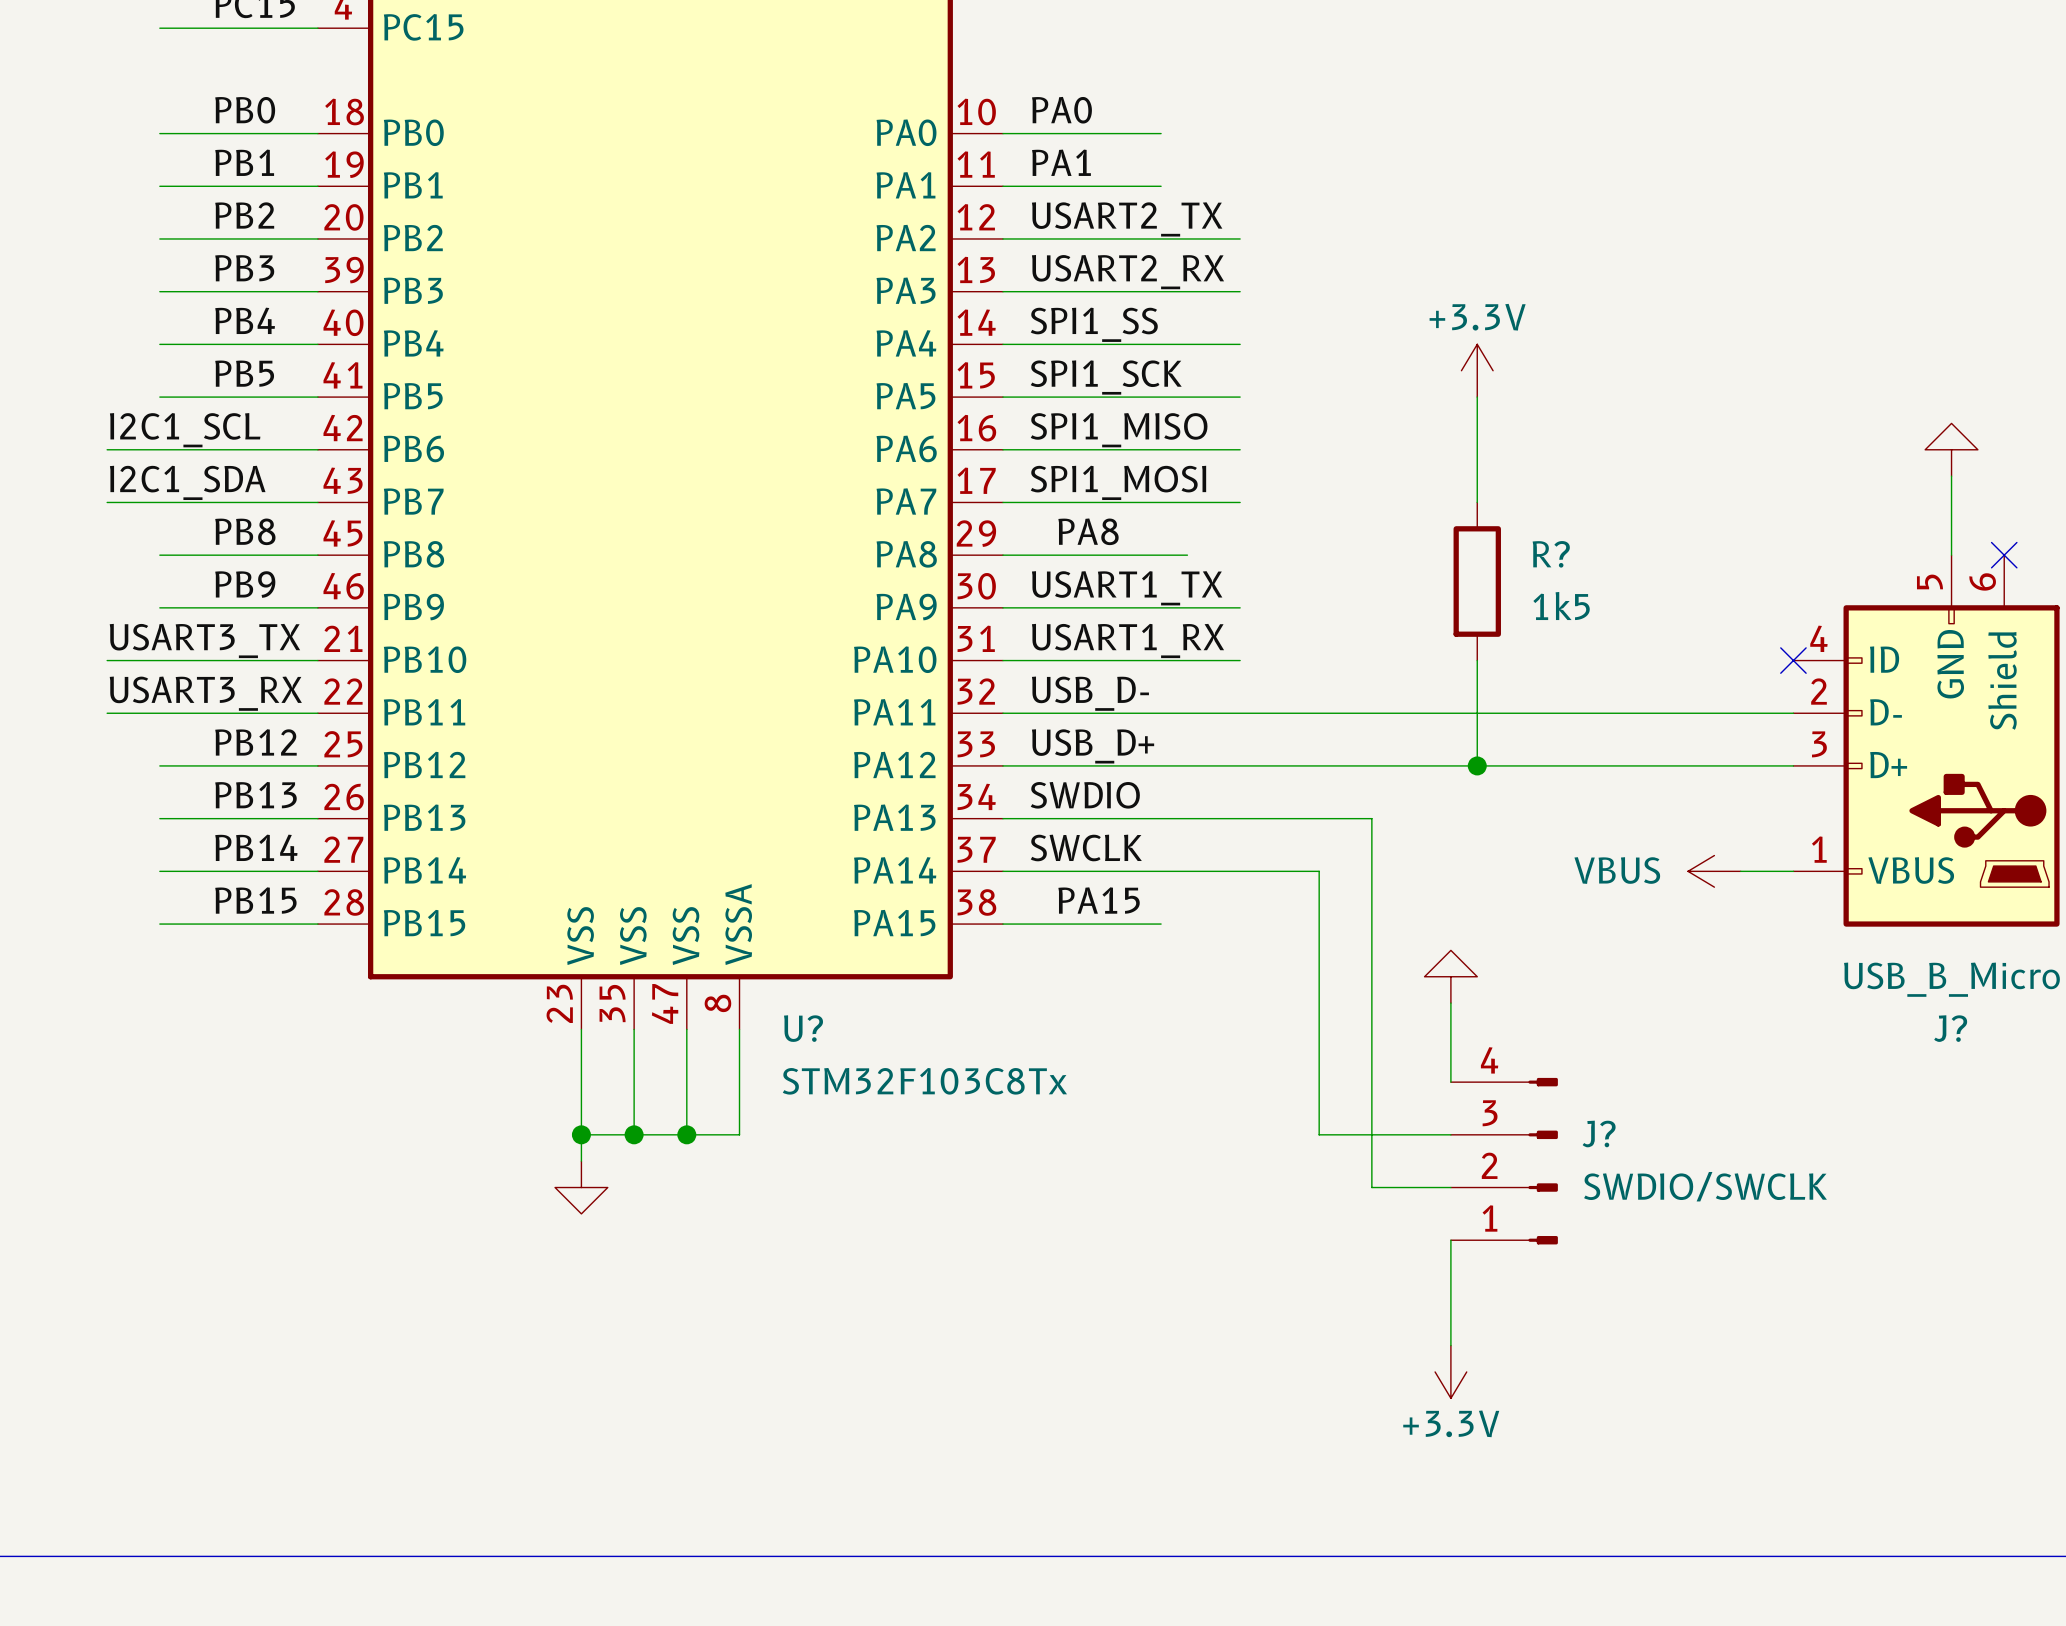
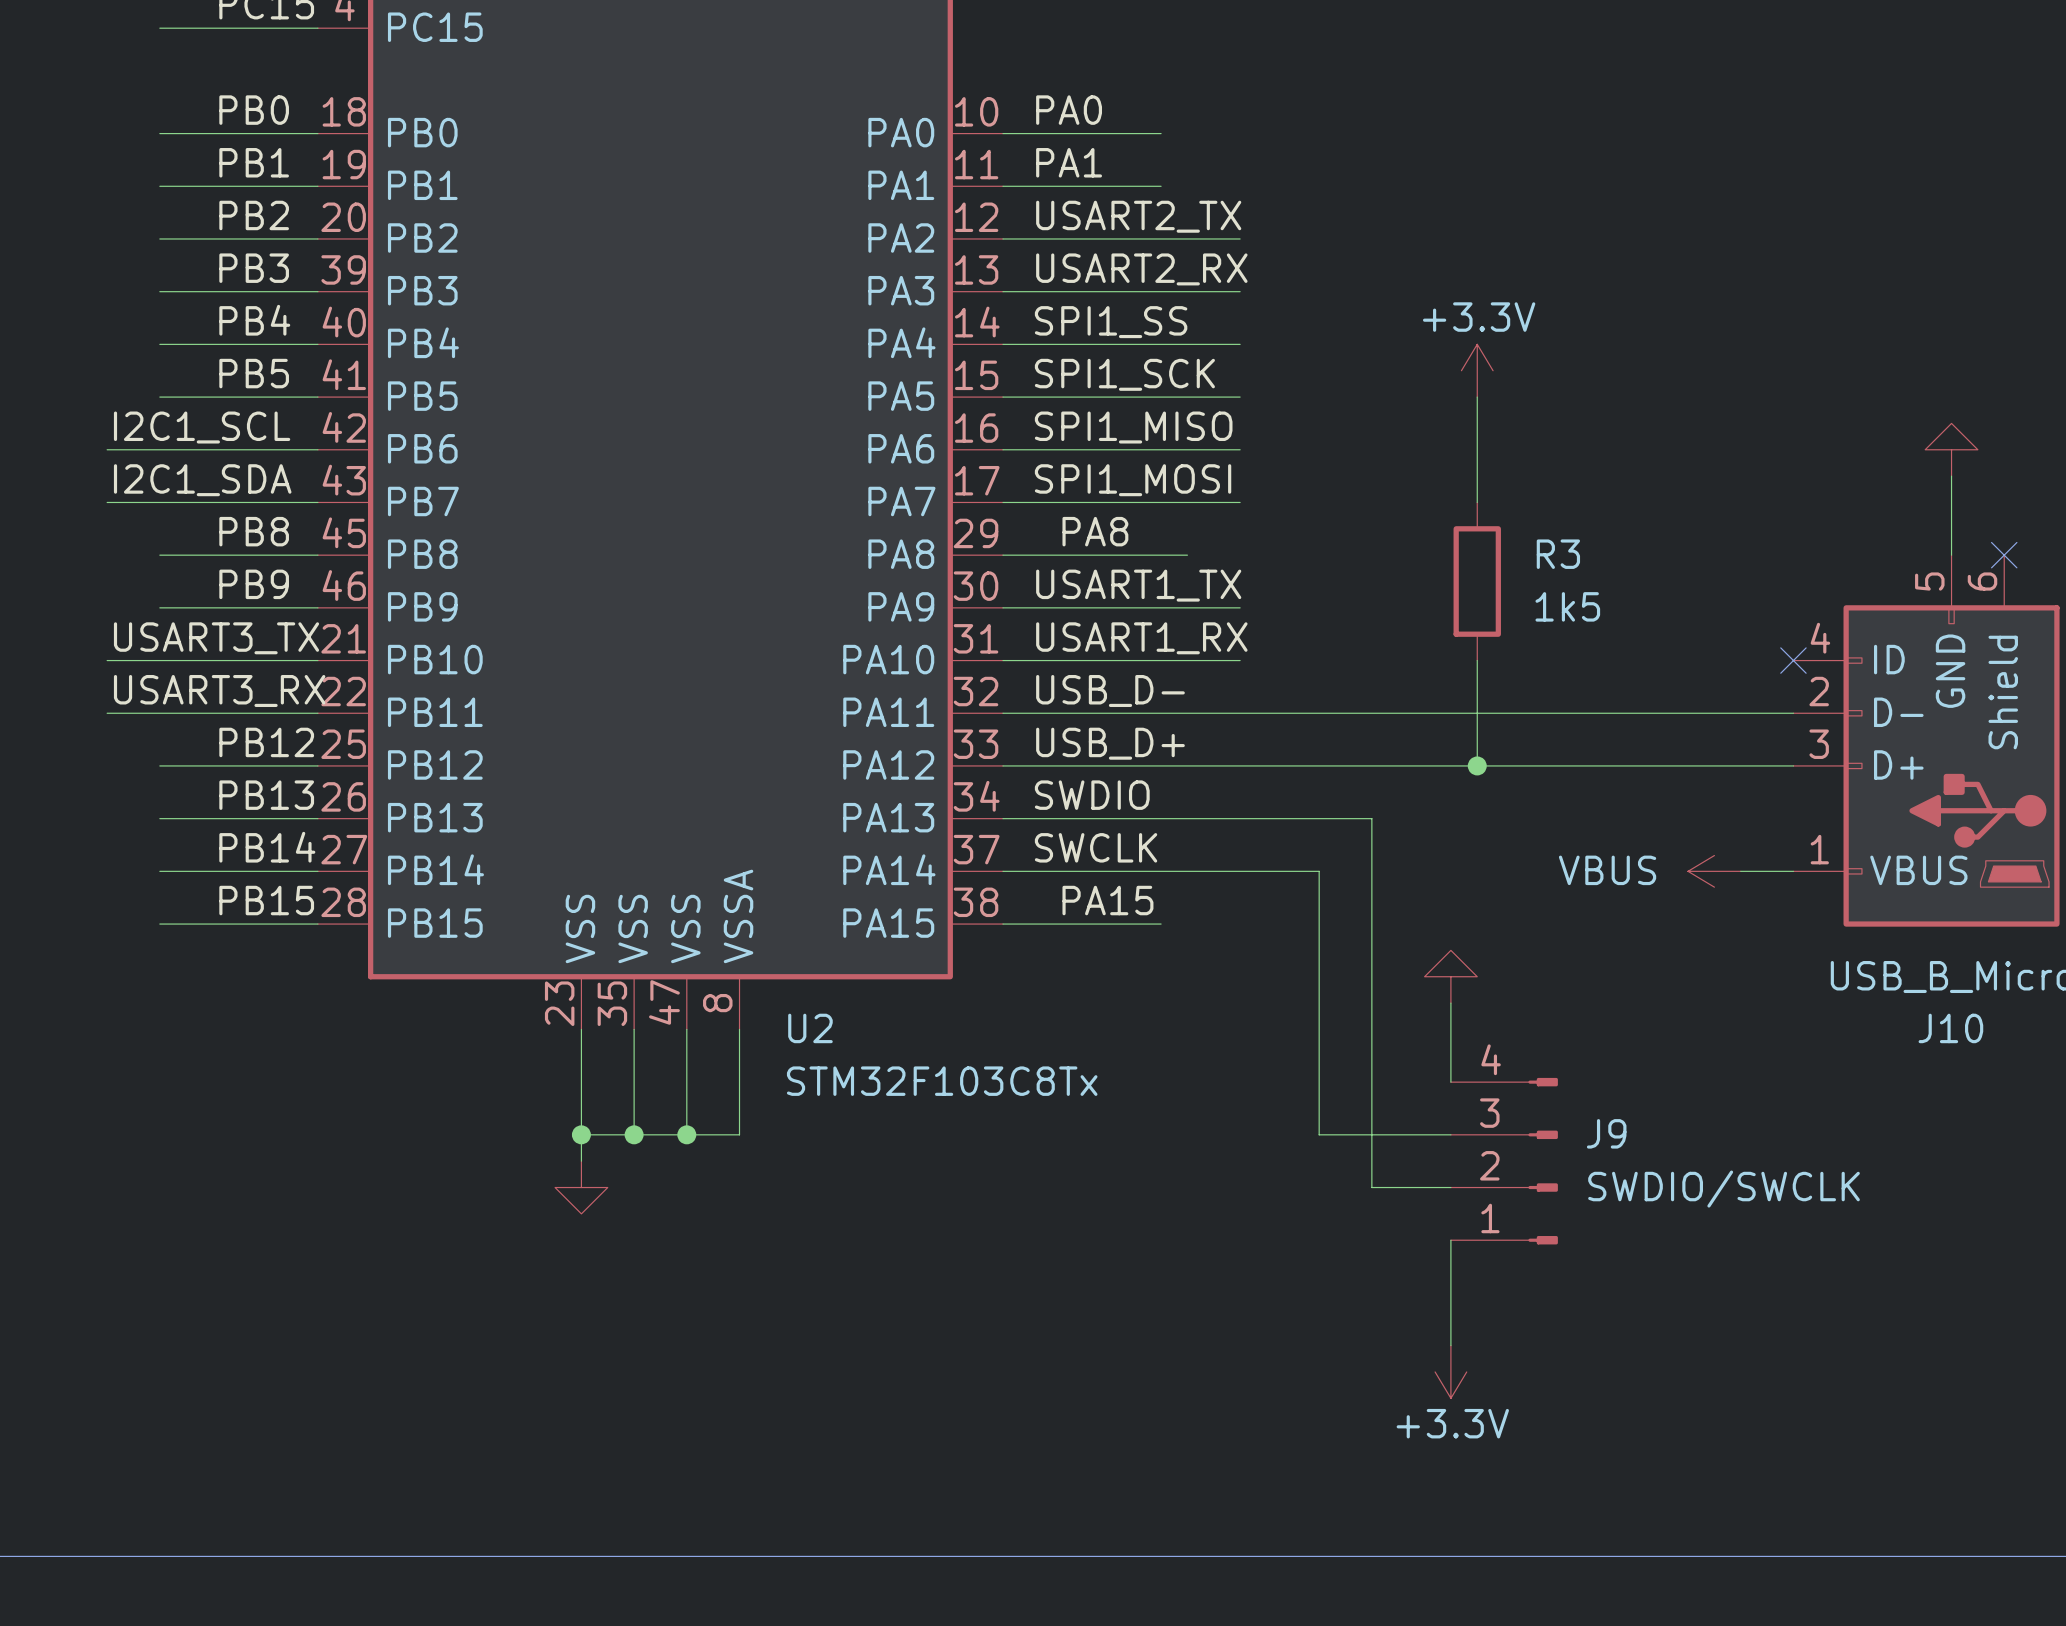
R? name: R? (1551, 554) -> R3 (1558, 554)
U? name: U? (803, 1028) -> U2 (810, 1028)
J? name: J? (1950, 1028) -> J10 (1950, 1028)
J? name: J? (1599, 1133) -> J9 (1606, 1133)

